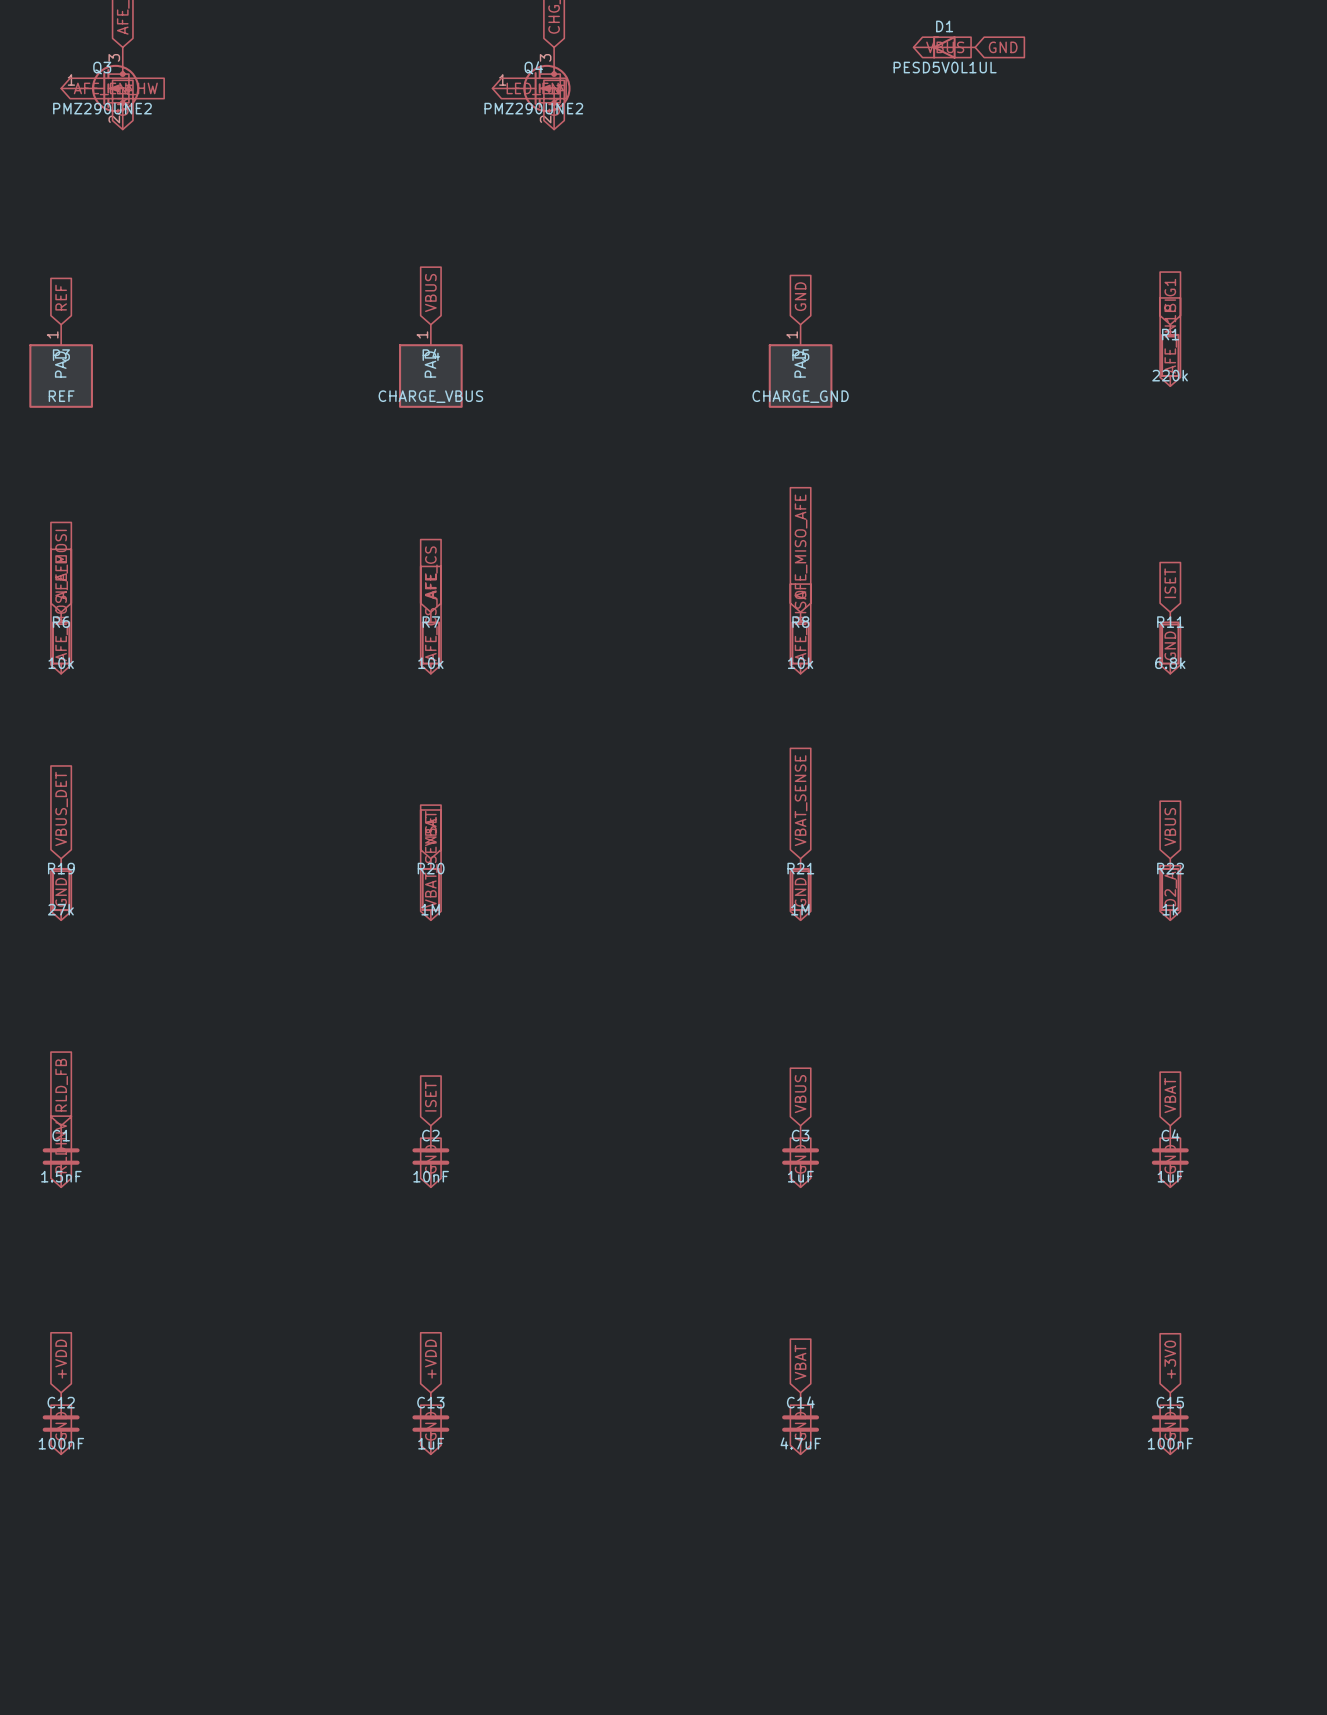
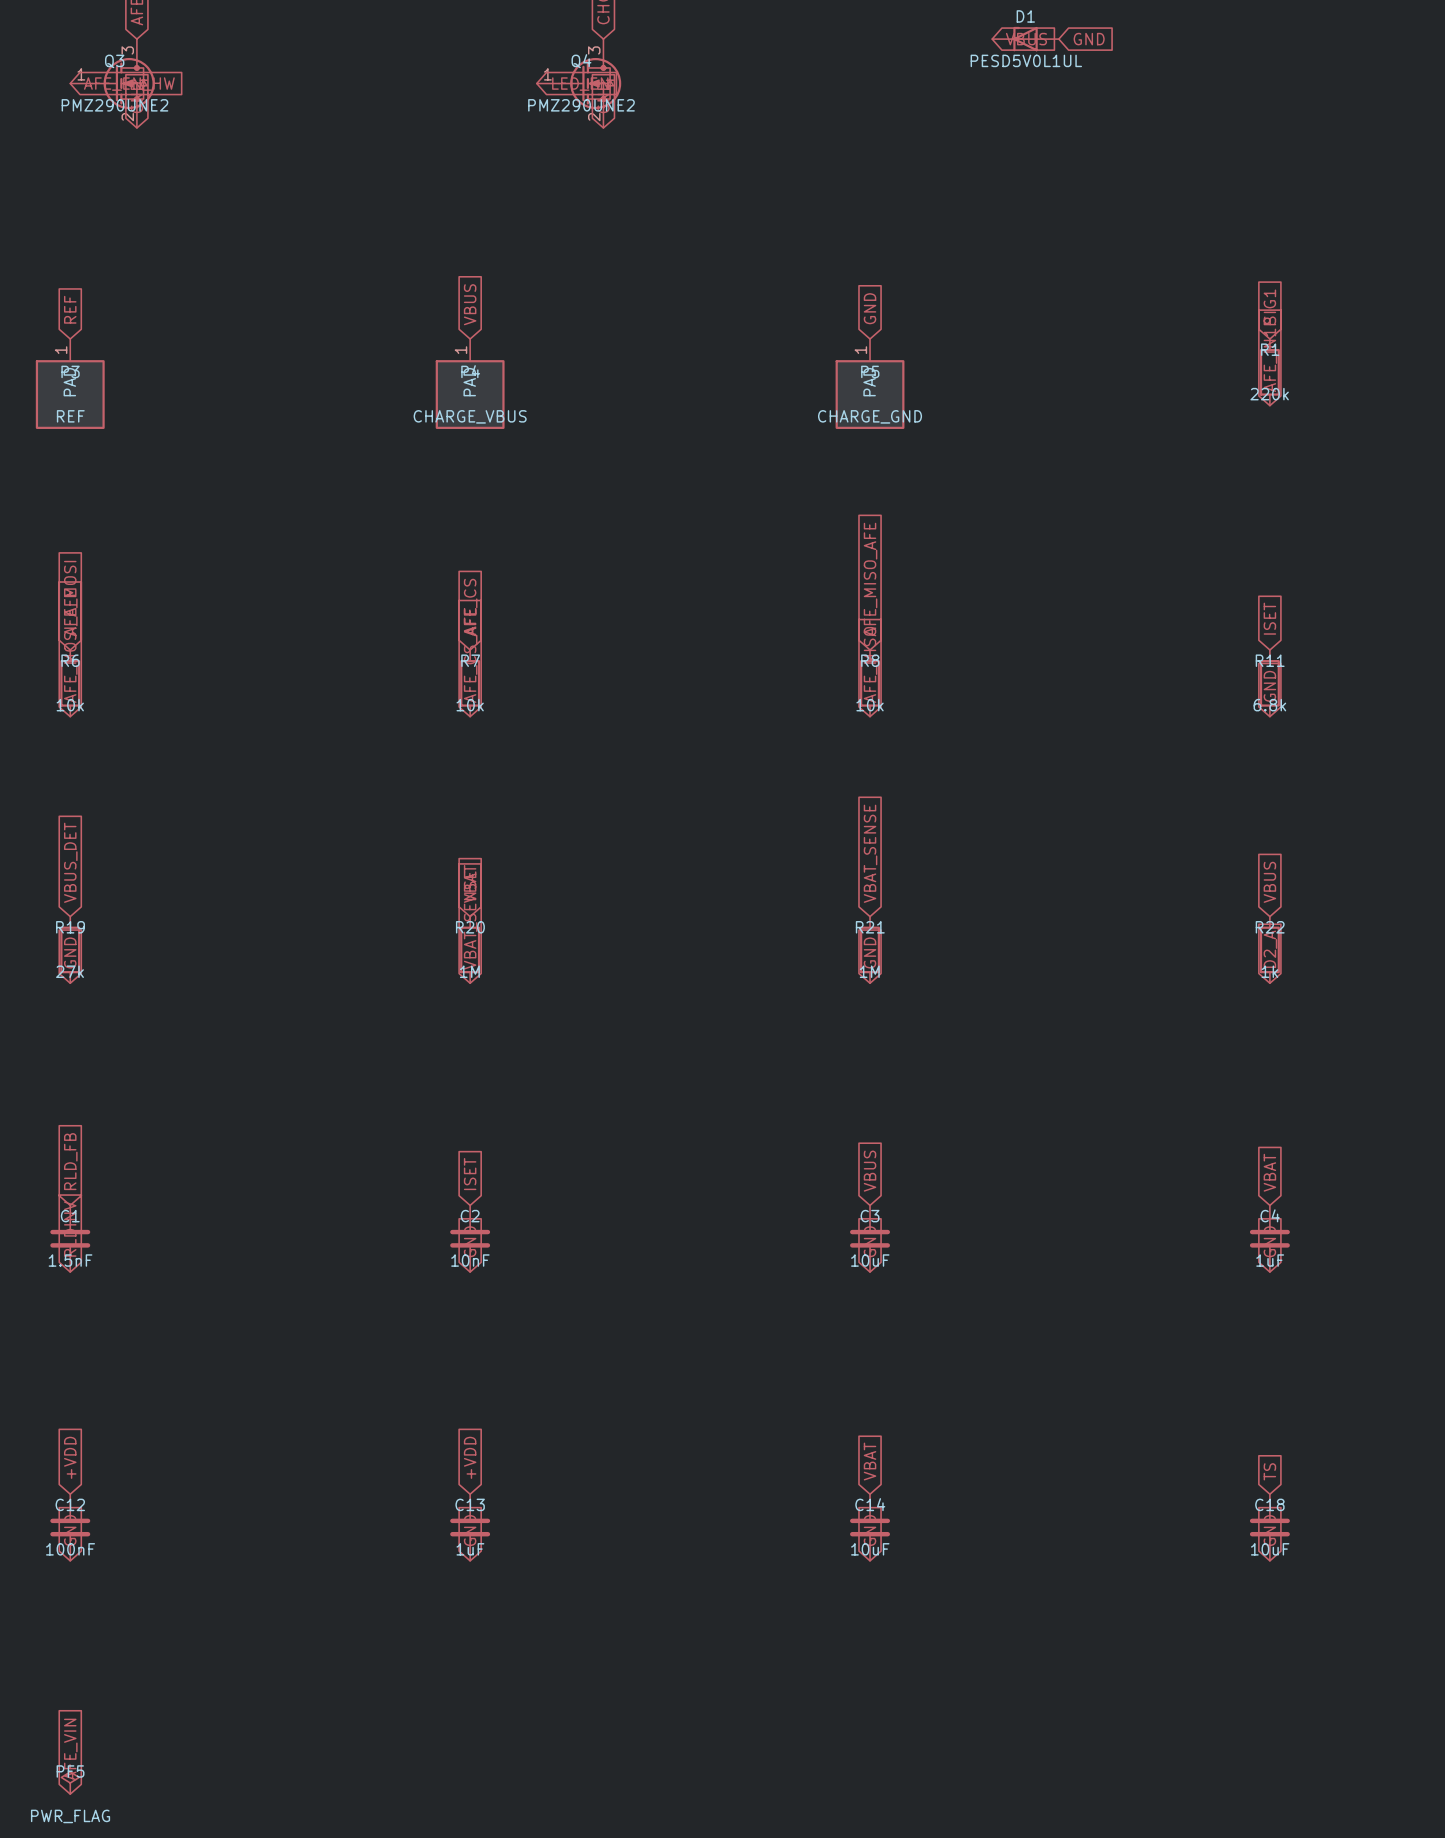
C3 value: 1uF (800, 1176) -> 10uF (870, 1260)
global label: +3V0 (1170, 1359) -> TS (1269, 1471)
C15 name: C15 (1170, 1402) -> C18 (1269, 1504)
C14 value: 4.7uF (800, 1443) -> 10uF (870, 1549)
C15 value: 100nF (1170, 1443) -> 10uF (1270, 1549)
global label: none -> AFE_VIN (70, 1749)
PF5: none -> PWR_FLAG (70, 1783)

